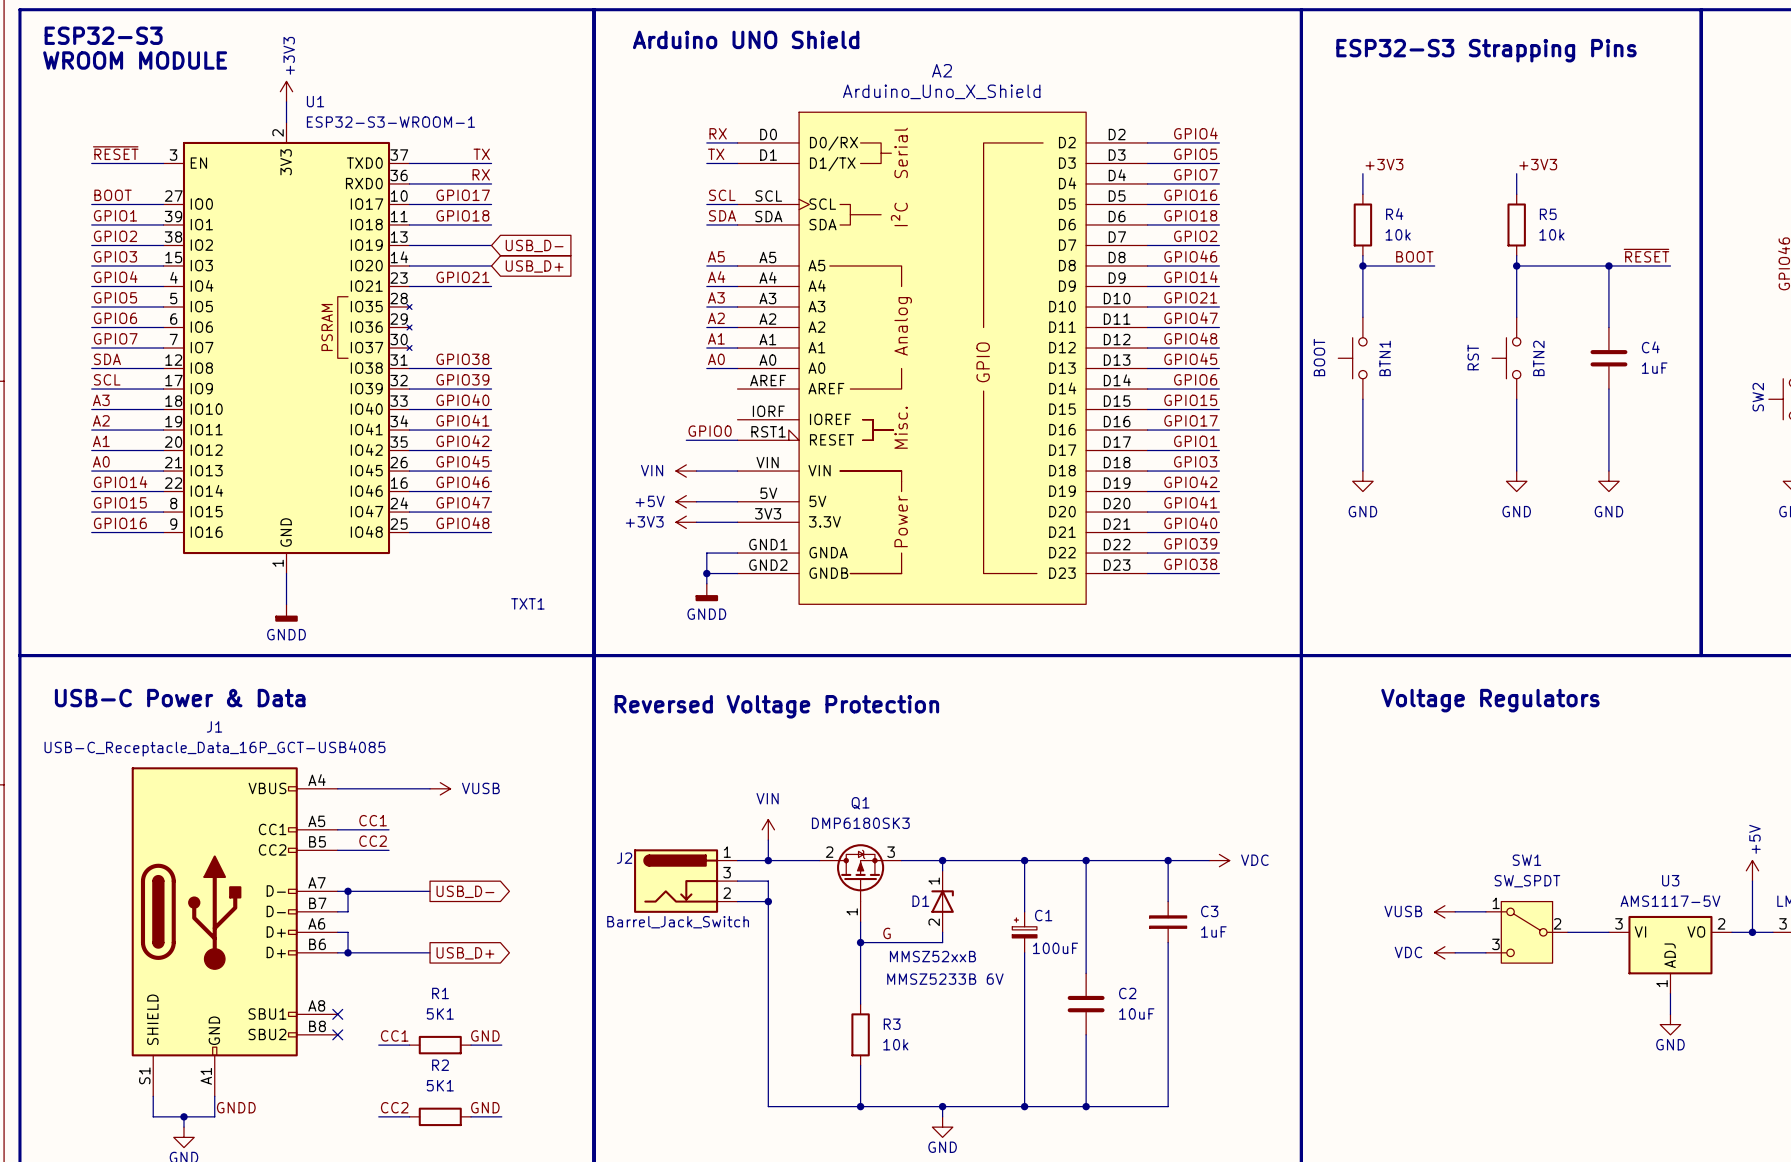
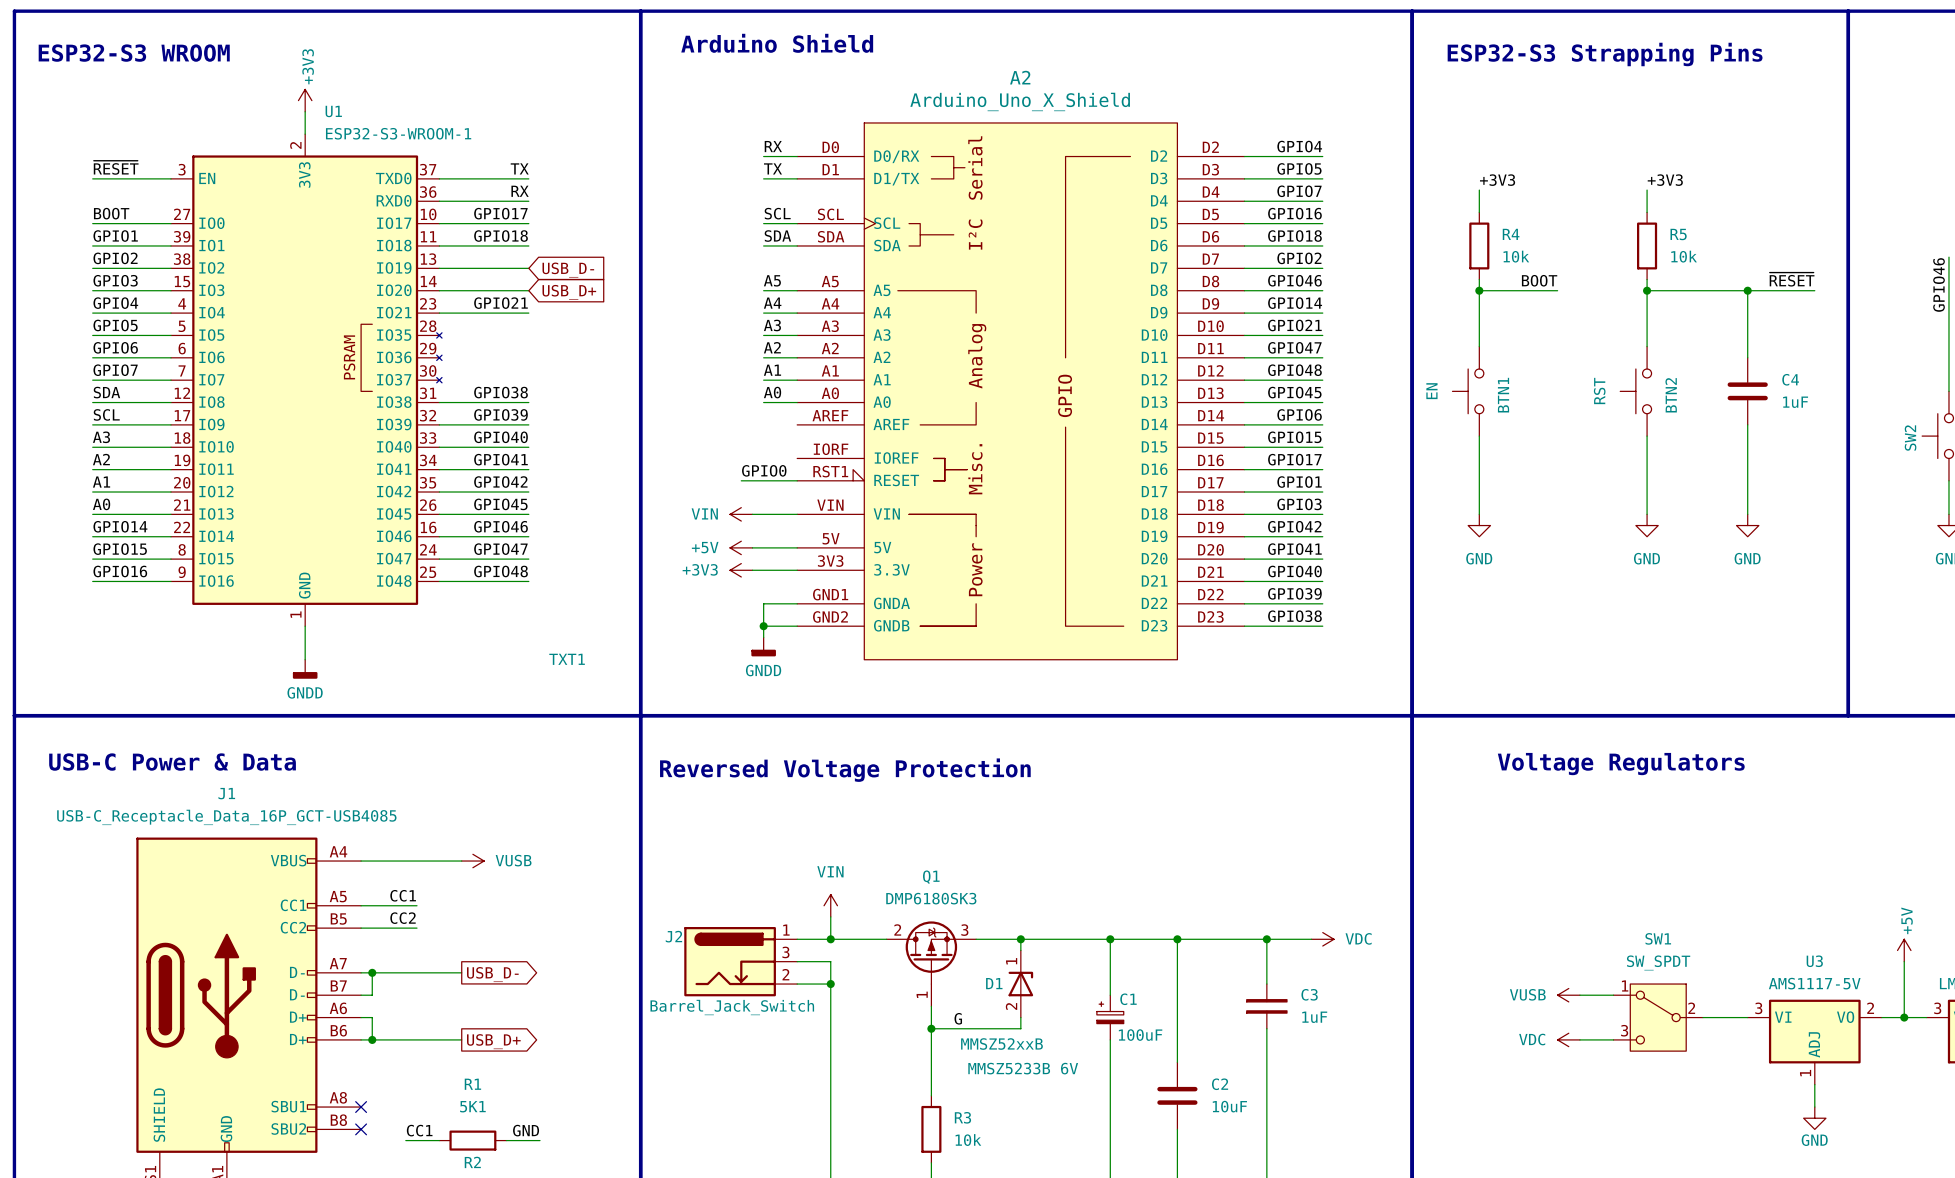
text: ESP32-S3 (103, 35) -> ESP32-S3 WROOM (134, 53)
text: Arduino UNO Shield (746, 39) -> Arduino Shield (777, 43)
text: WROOM MODULE (135, 60) -> none
BTN1 value: BOOT (1319, 357) -> EN (1431, 391)

